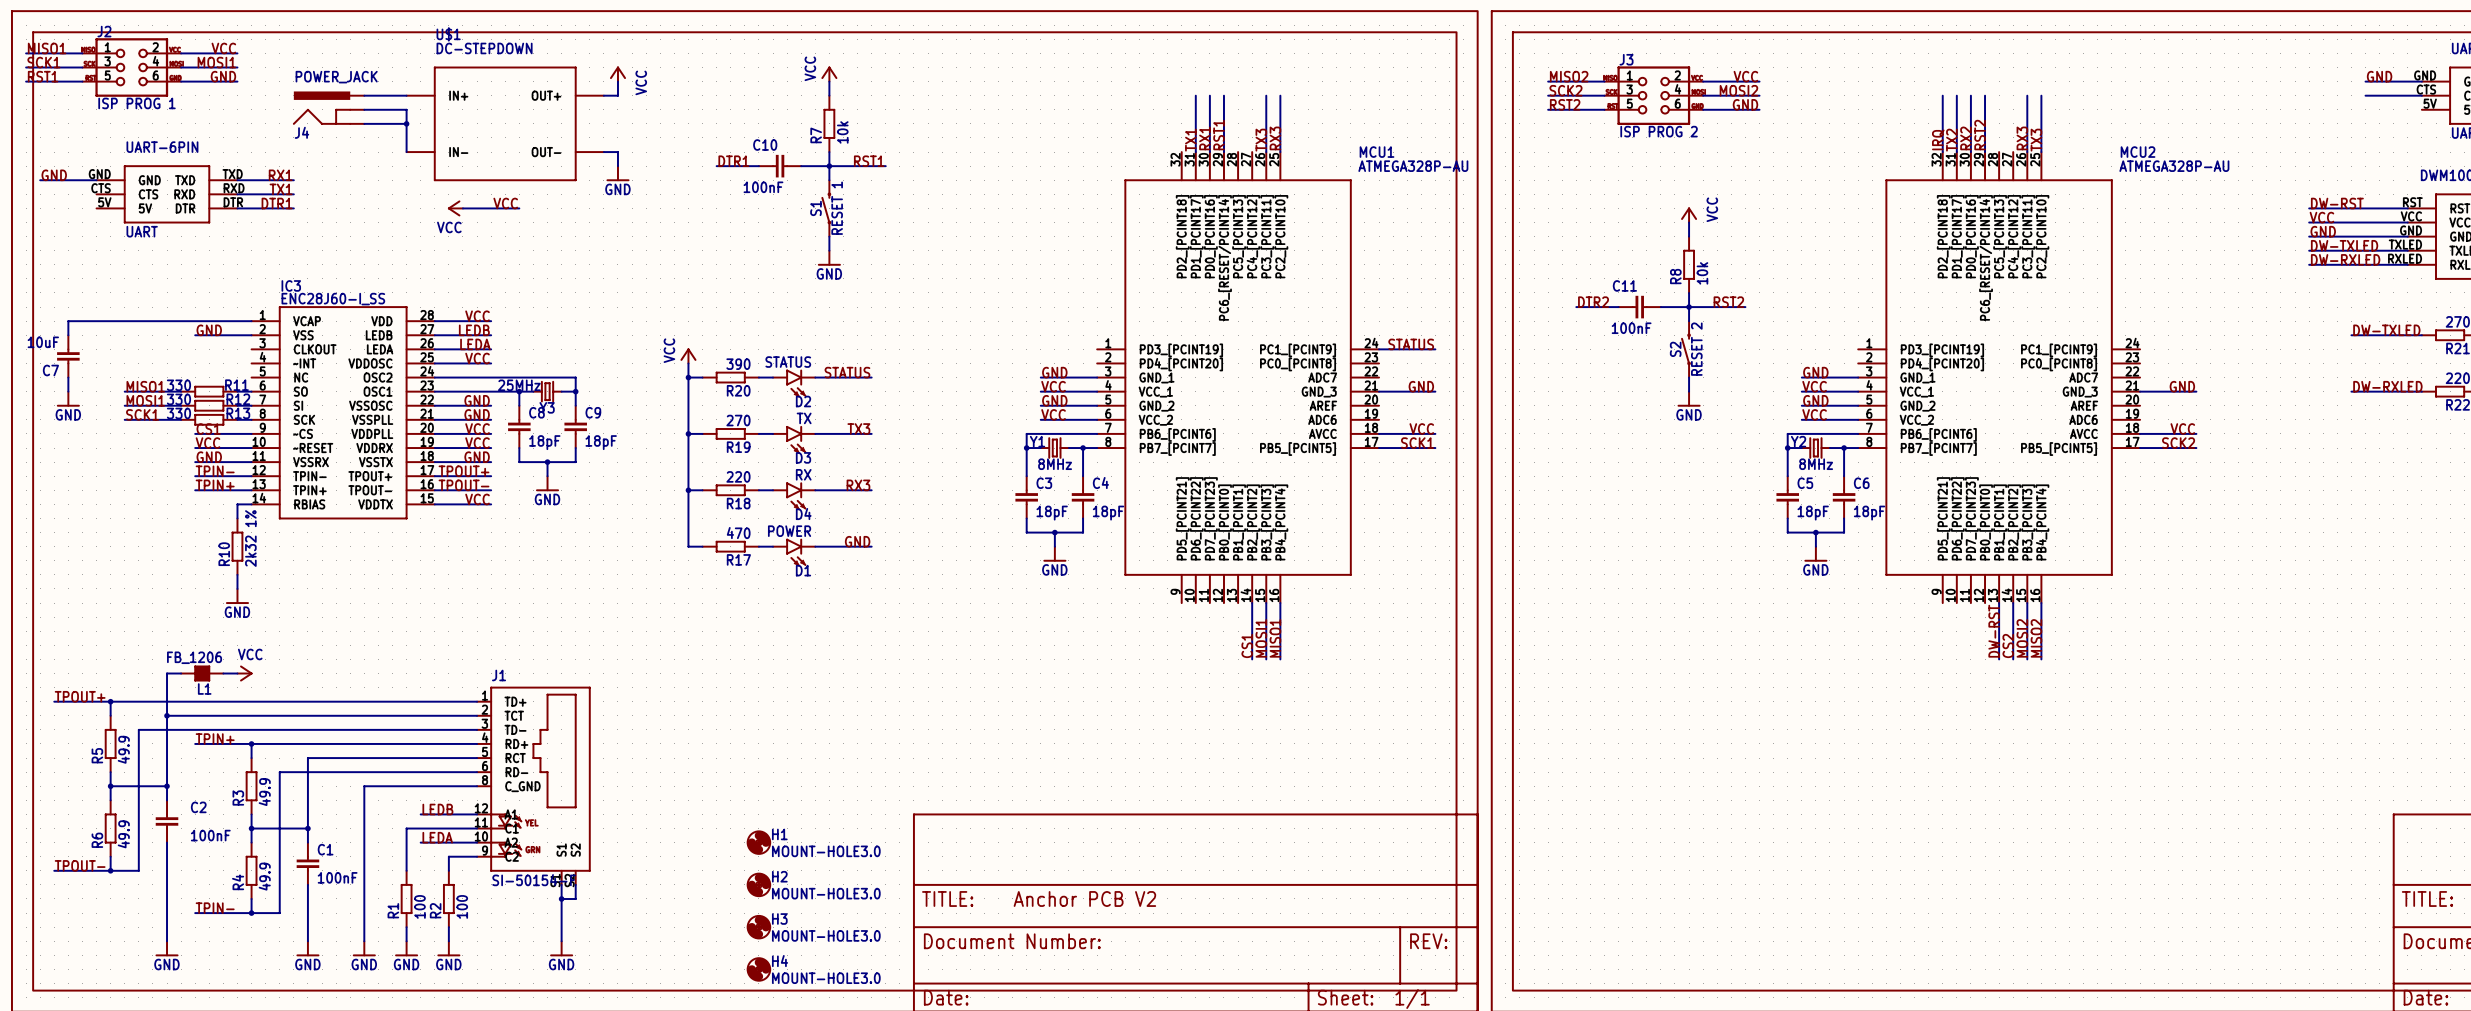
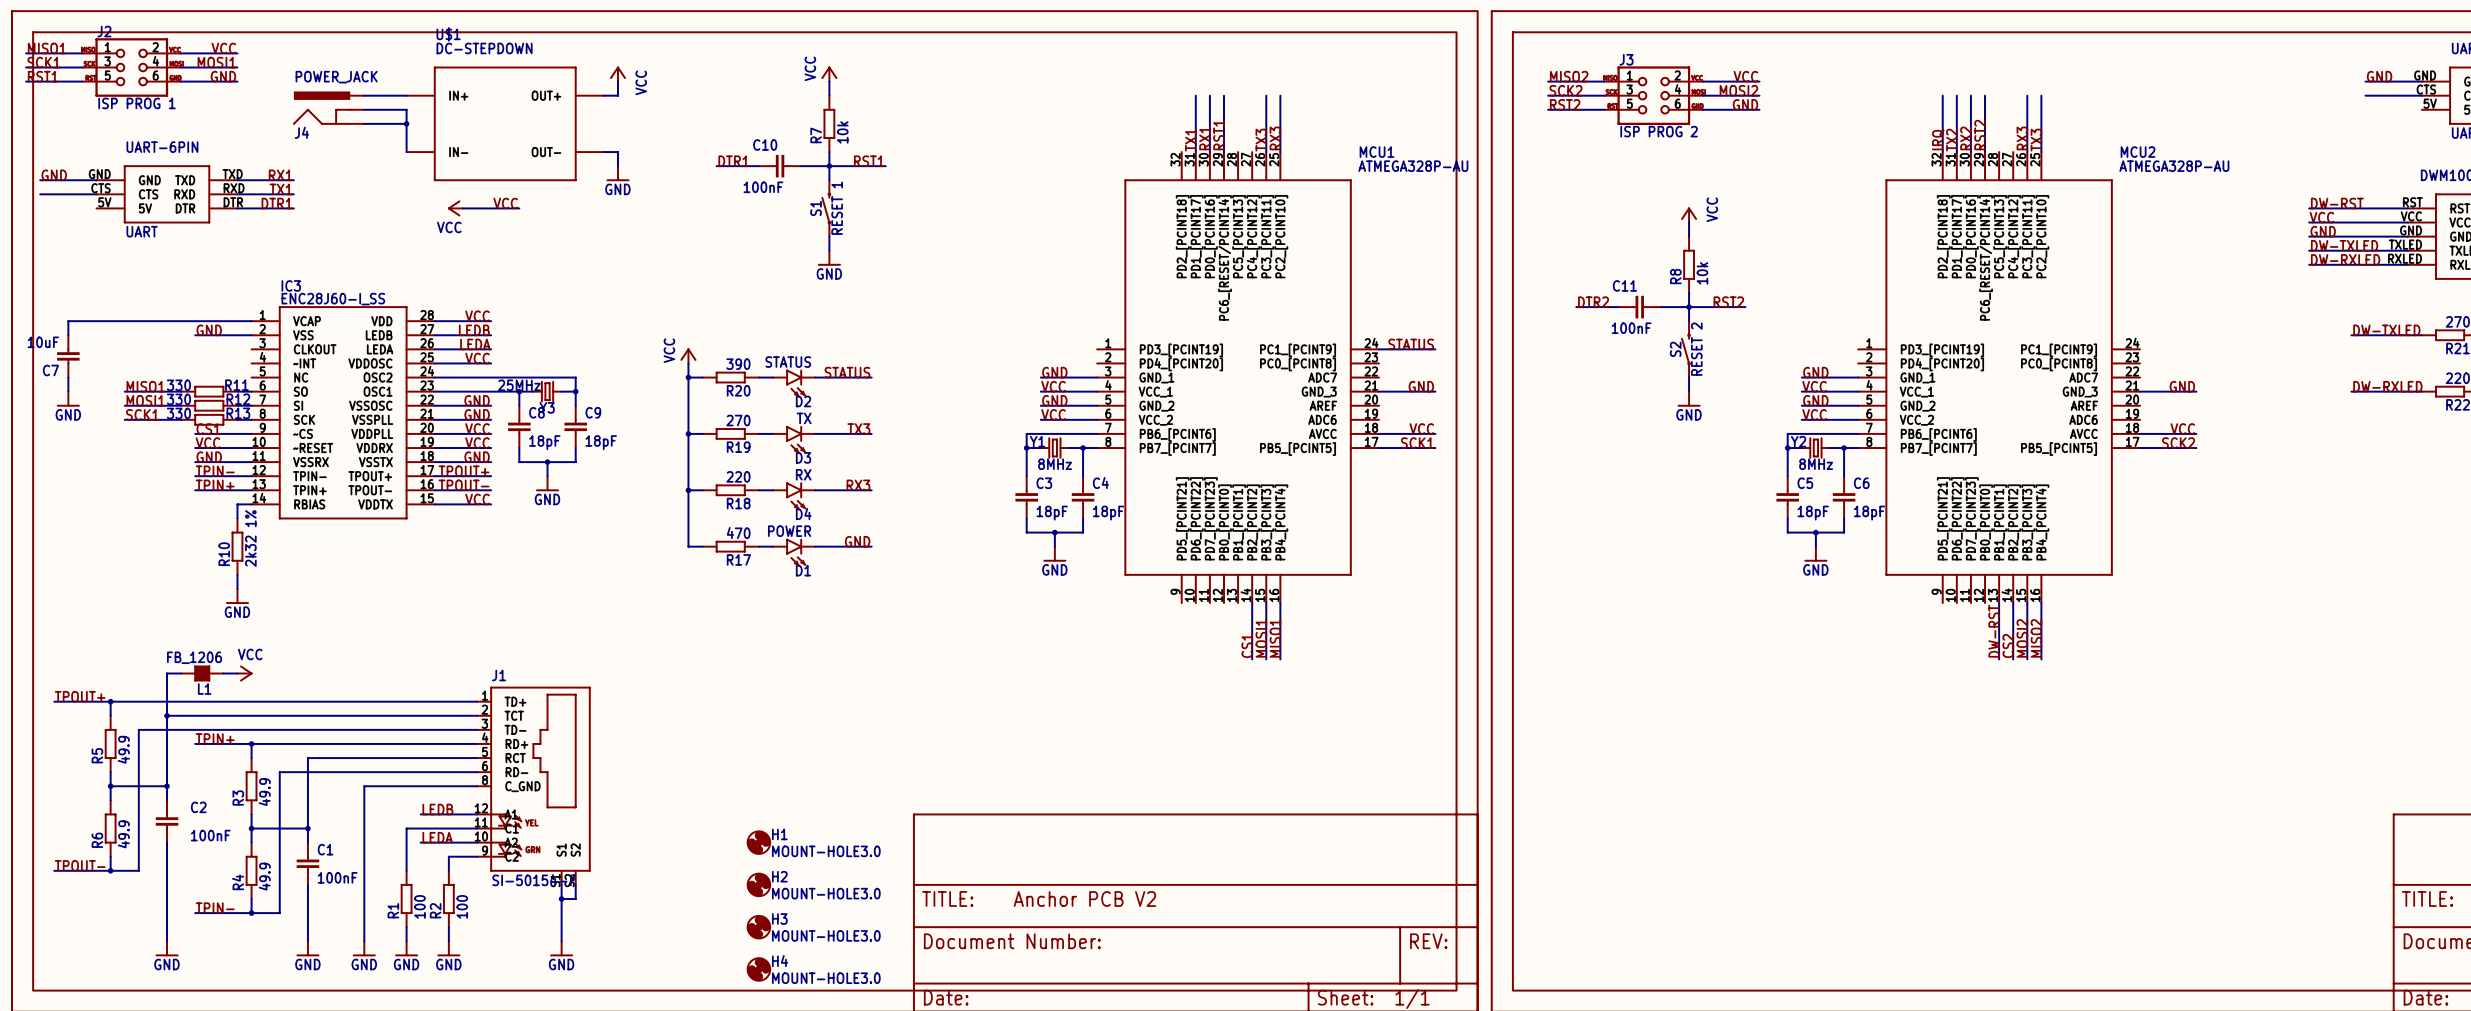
wire: none -> (40, 194) (96, 194)

